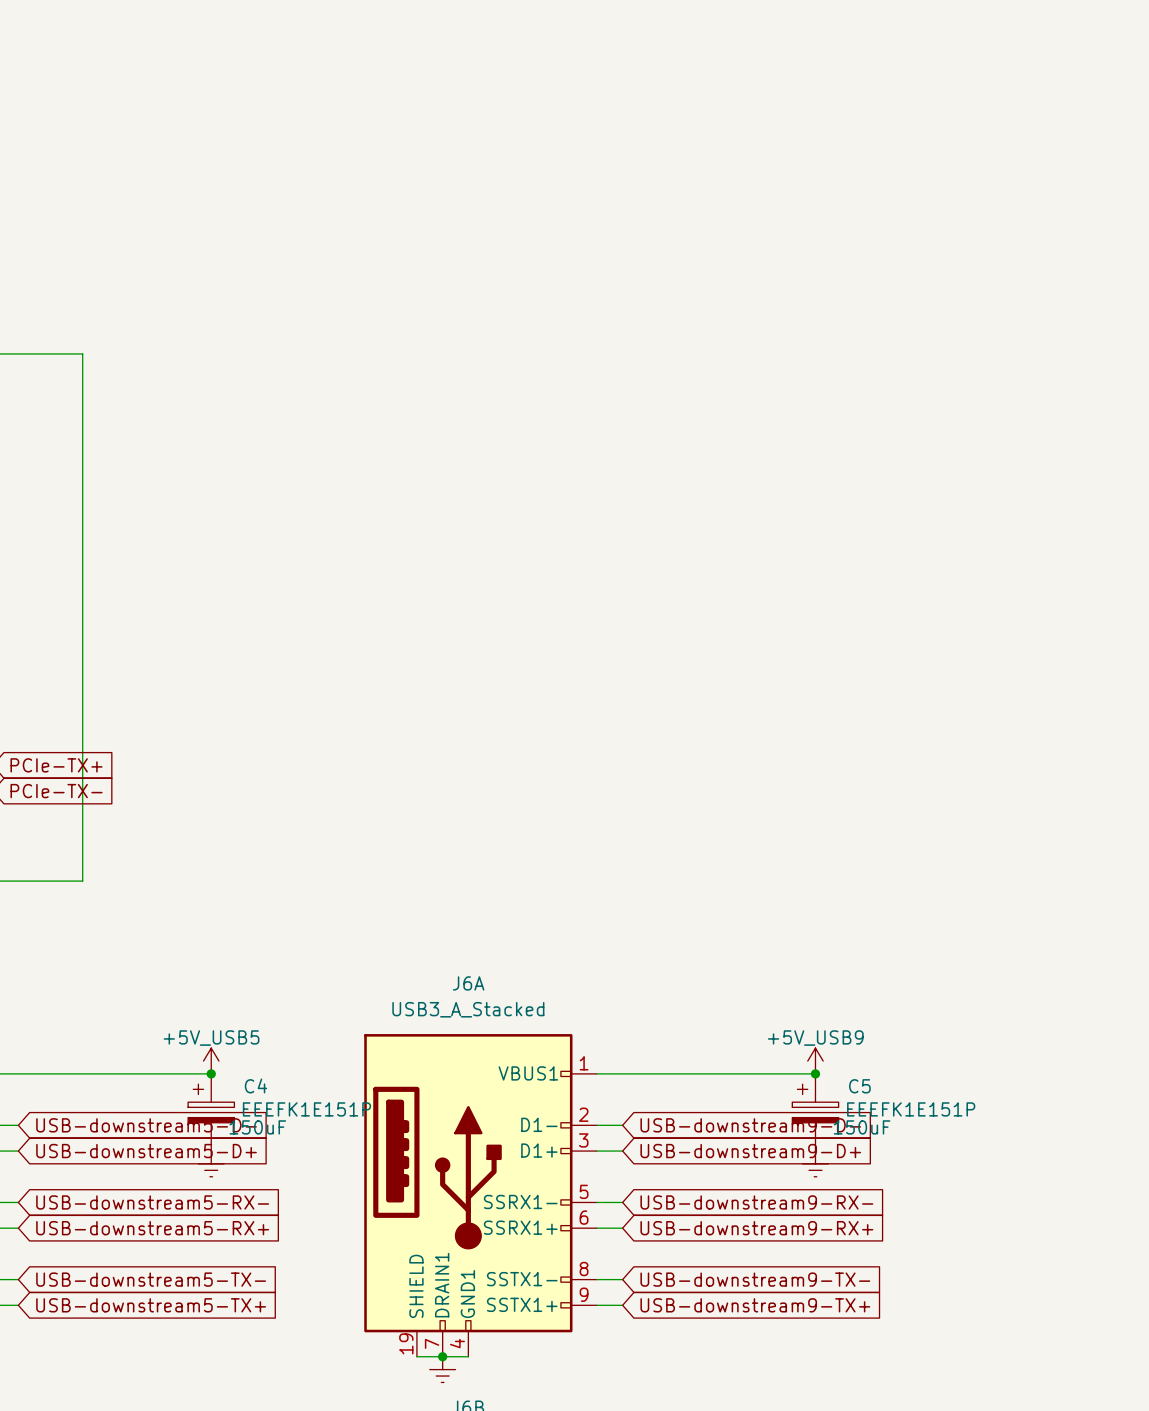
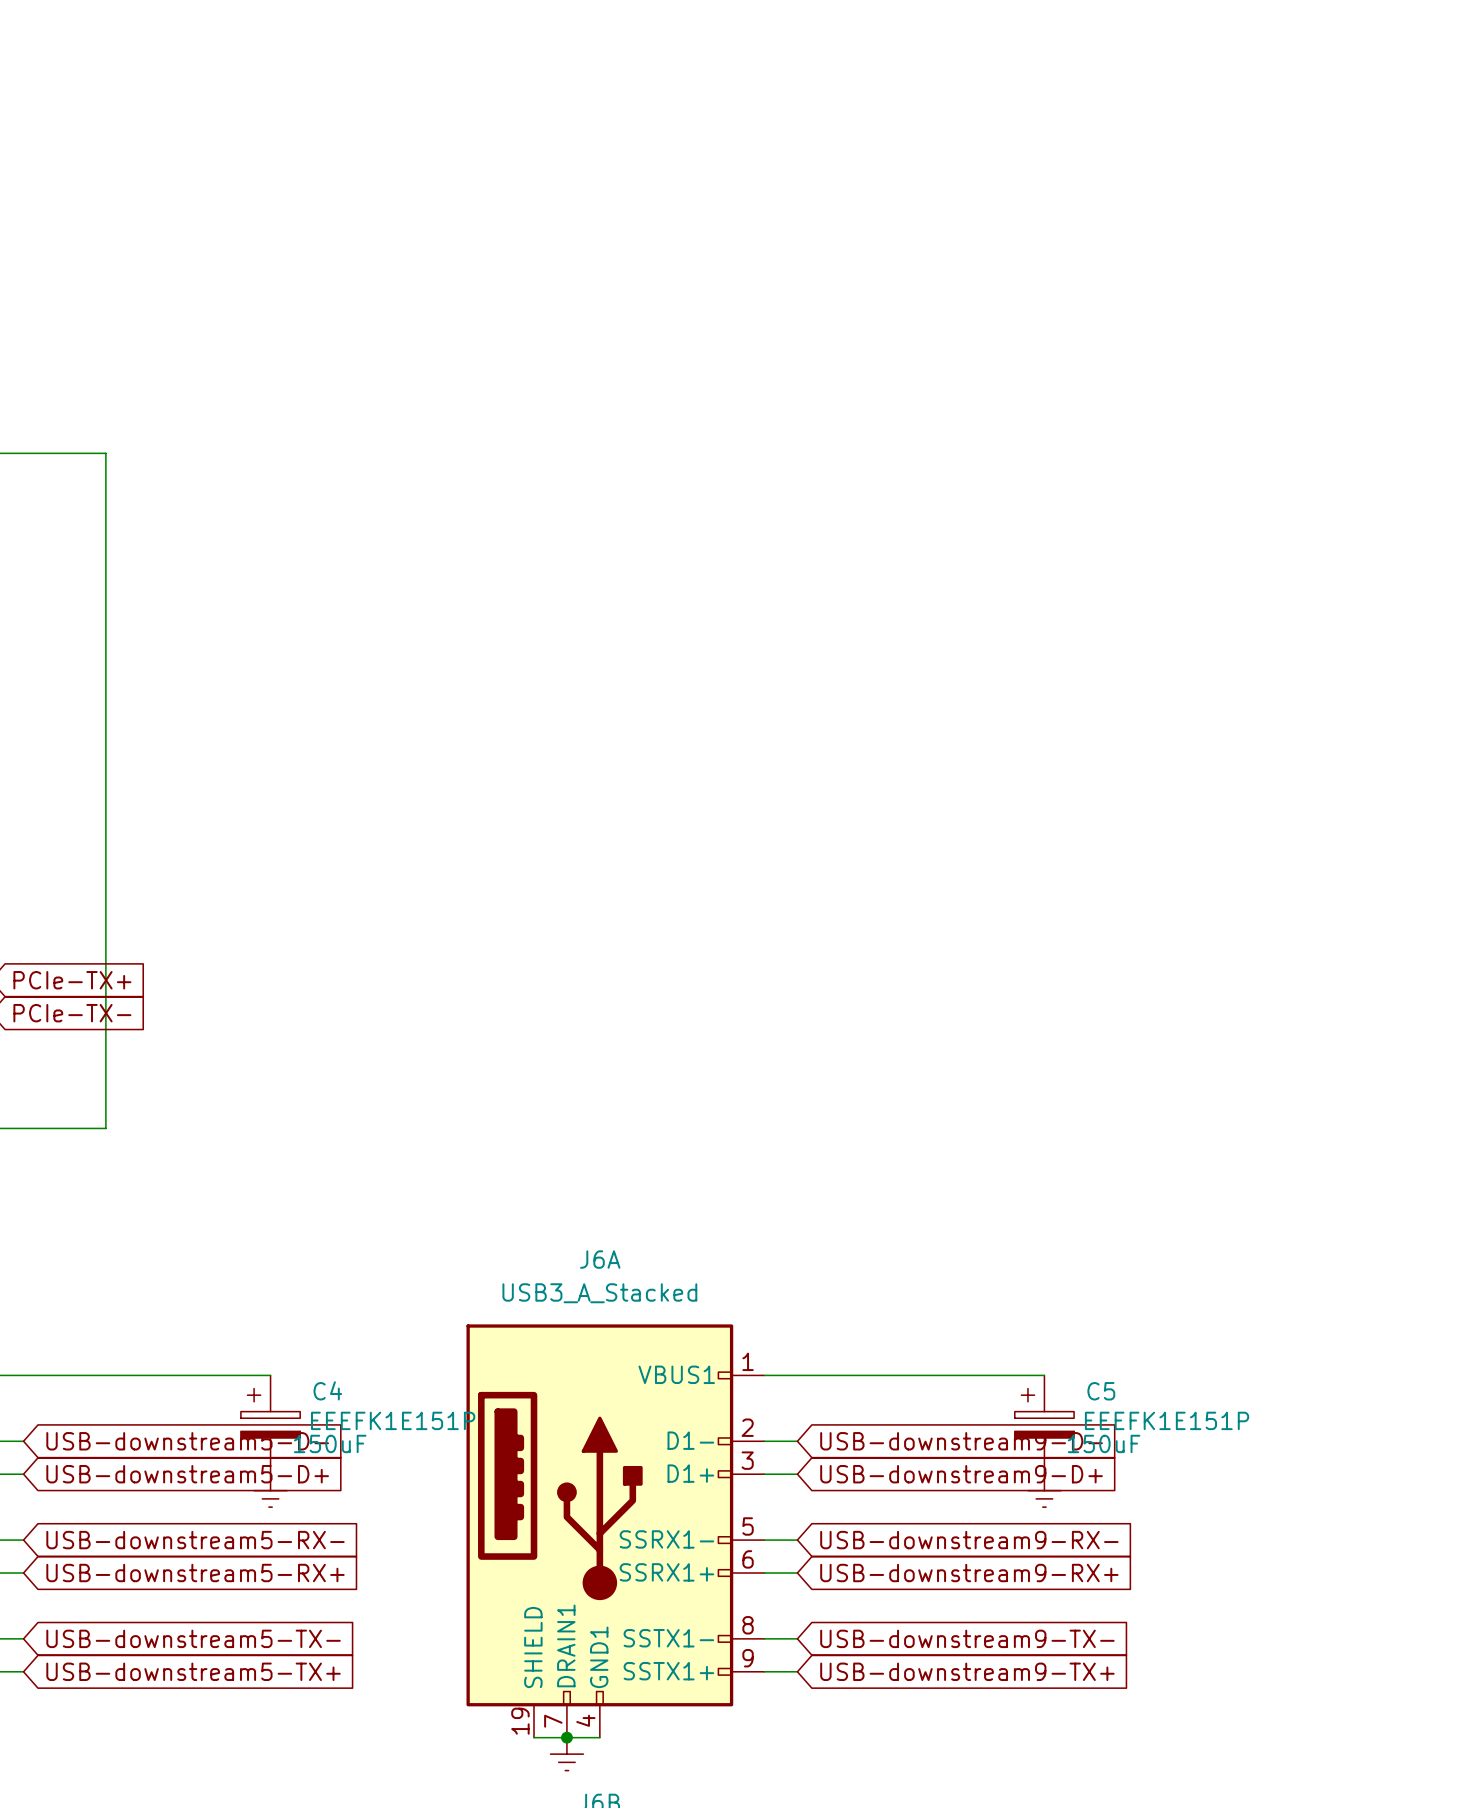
power symbol: +5V_USB5 (211, 1061) -> none
power symbol: +5V_USB9 (815, 1061) -> none
junction: (211, 1073) -> none
junction: (815, 1073) -> none

